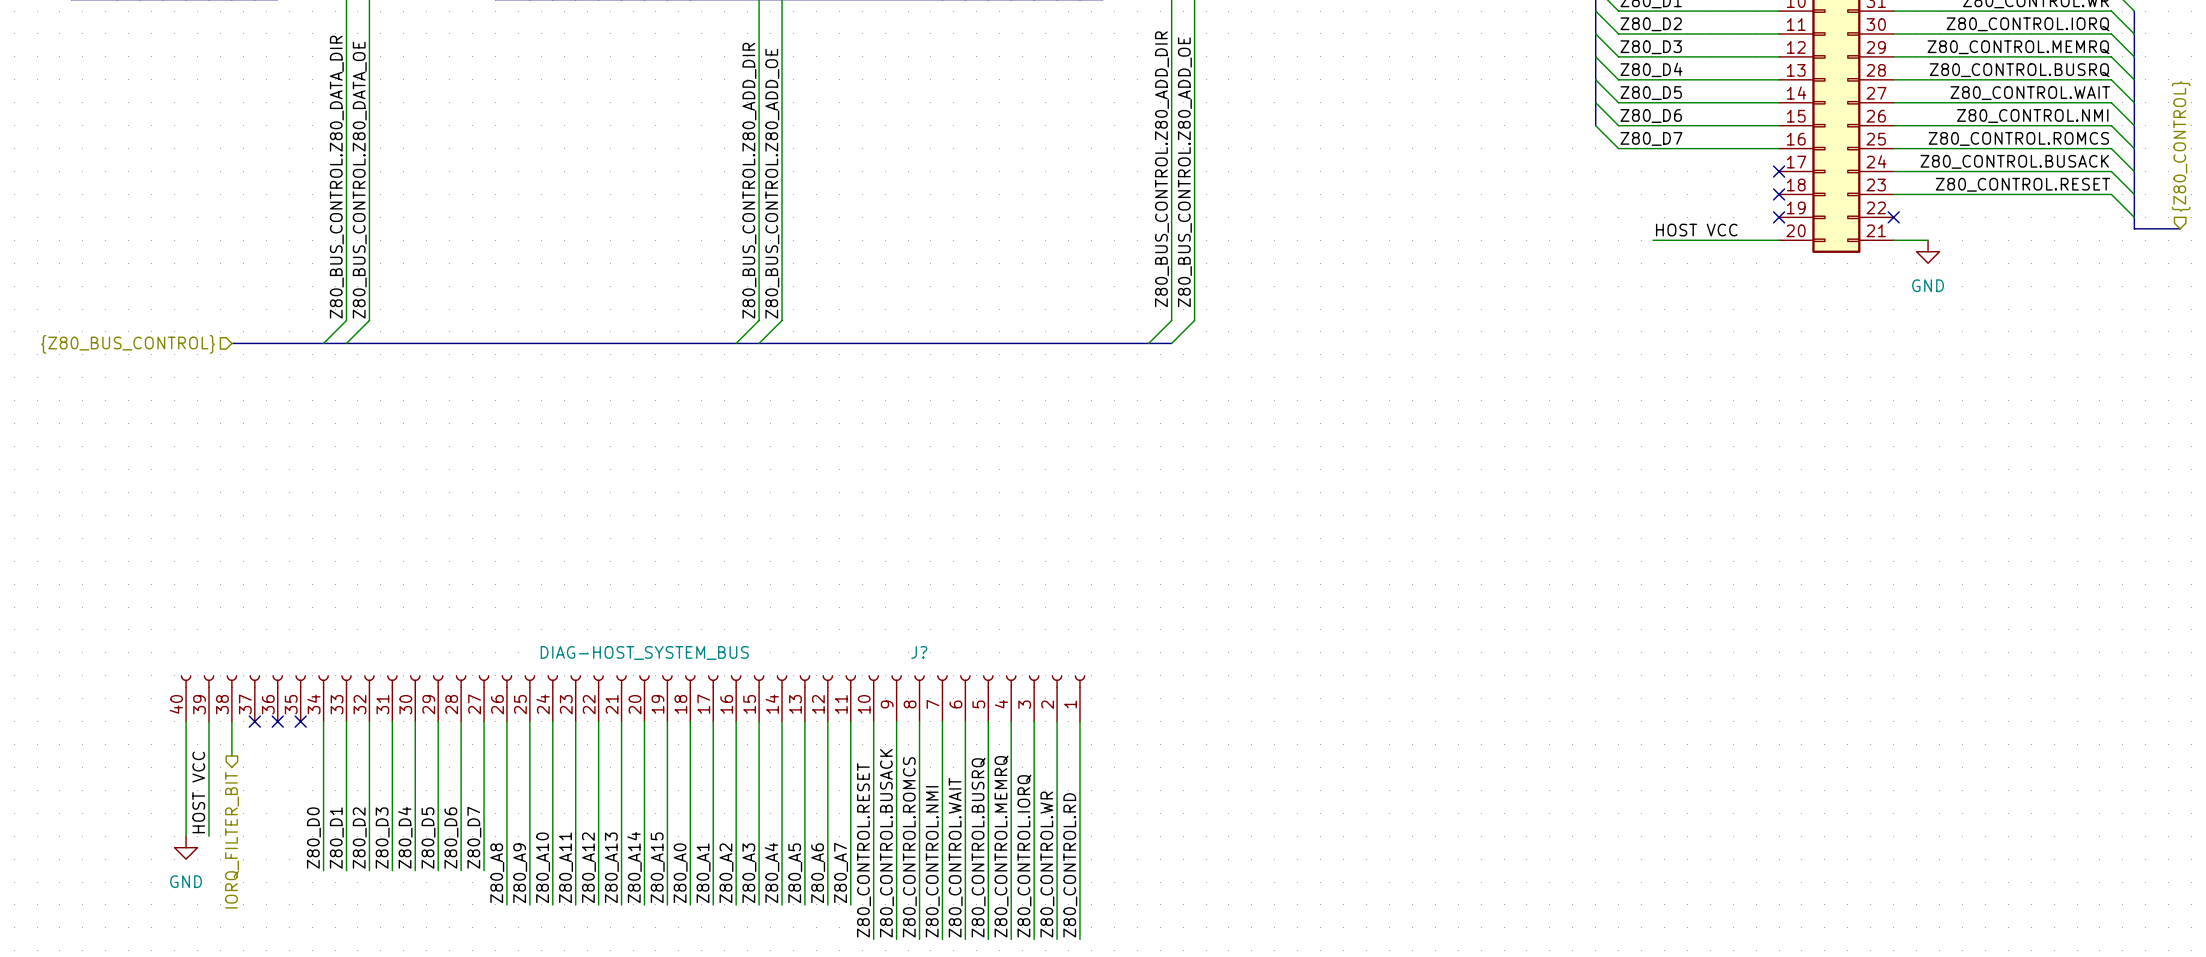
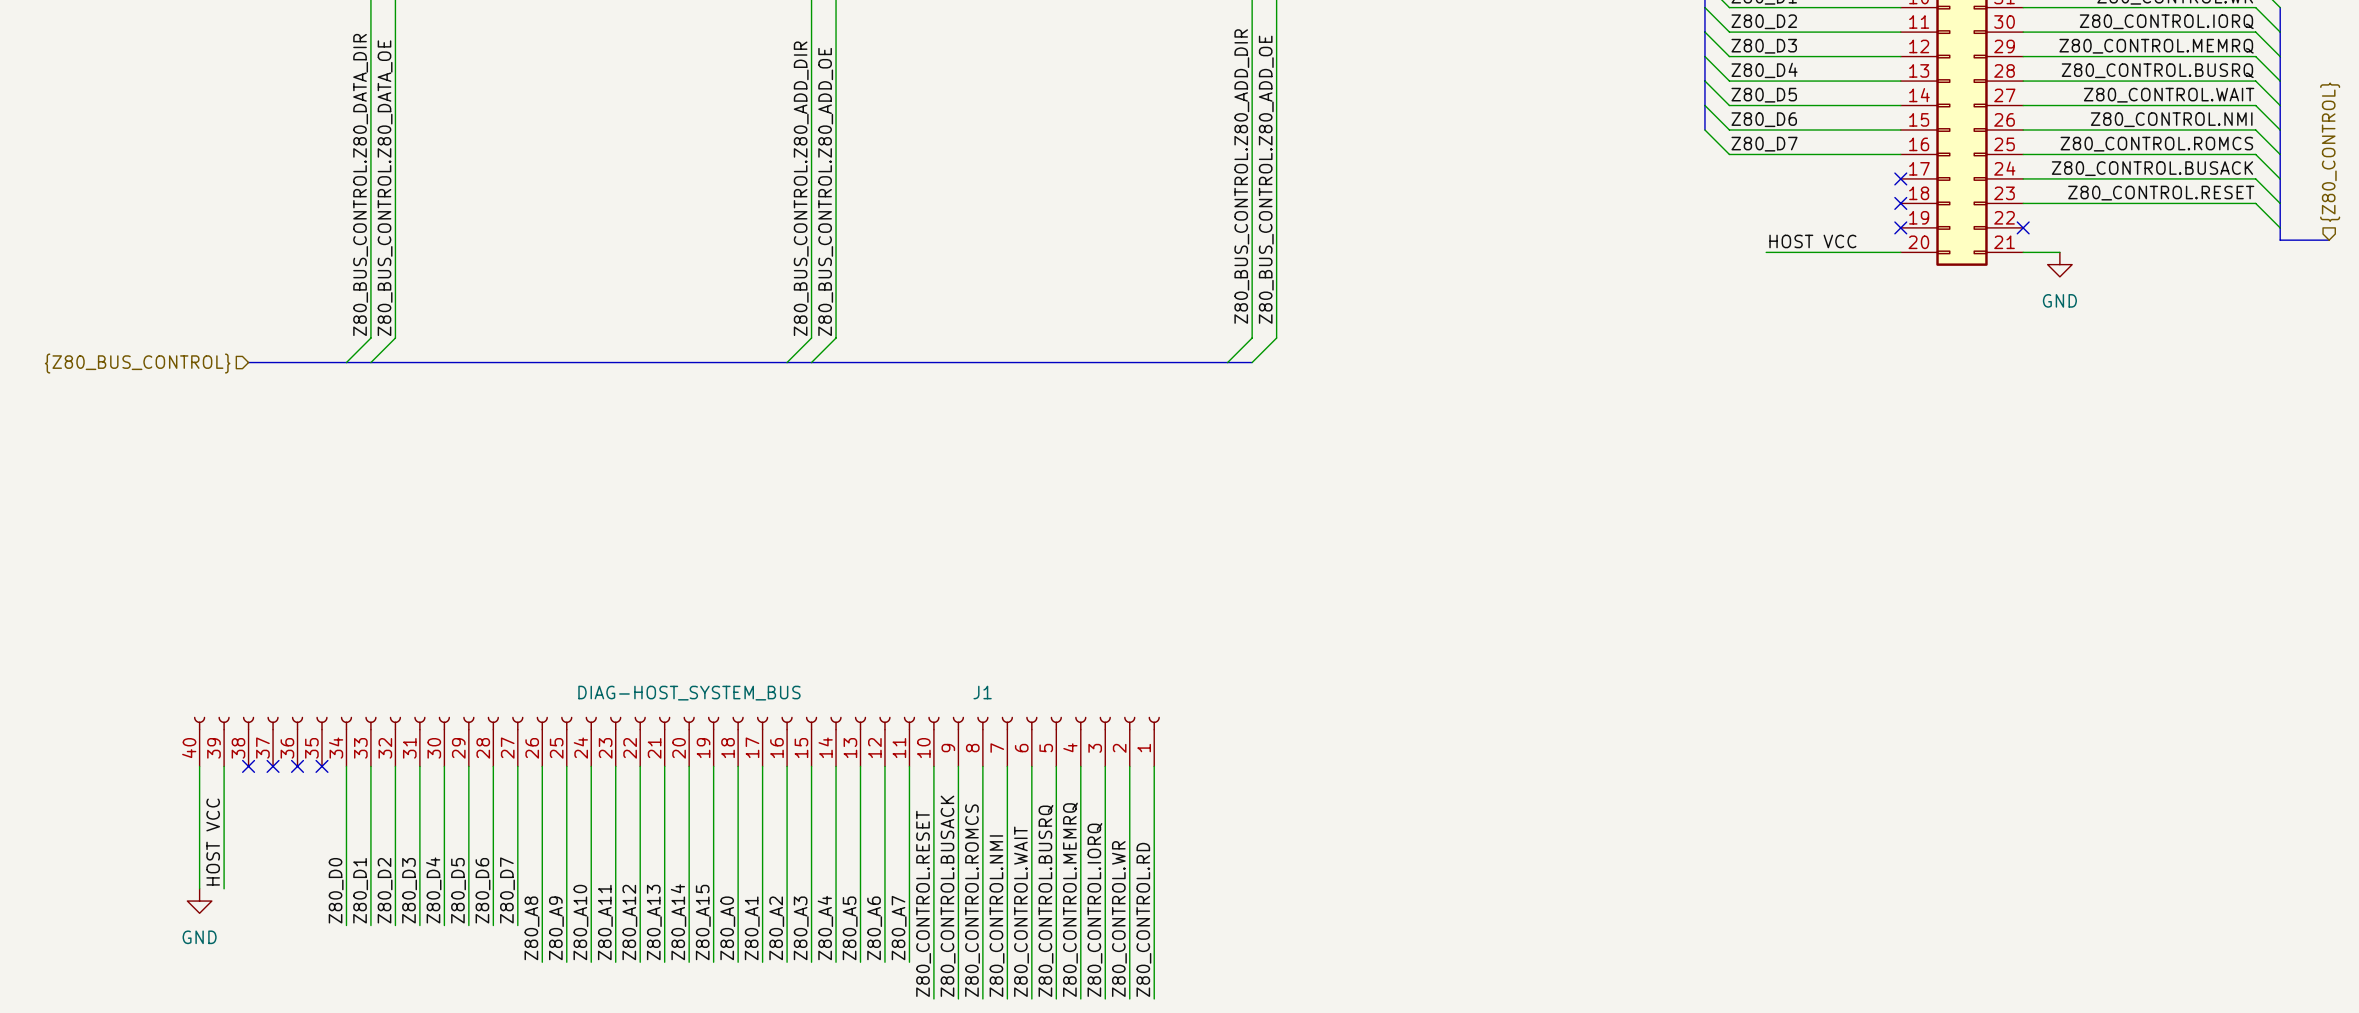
J? name: J? (919, 652) -> J1 (982, 692)
wire: (231, 721) (231, 756) -> none
no-connect mark: none -> (248, 766)
hierarchical label: IORQ_FILTER_BIT (232, 840) -> none

